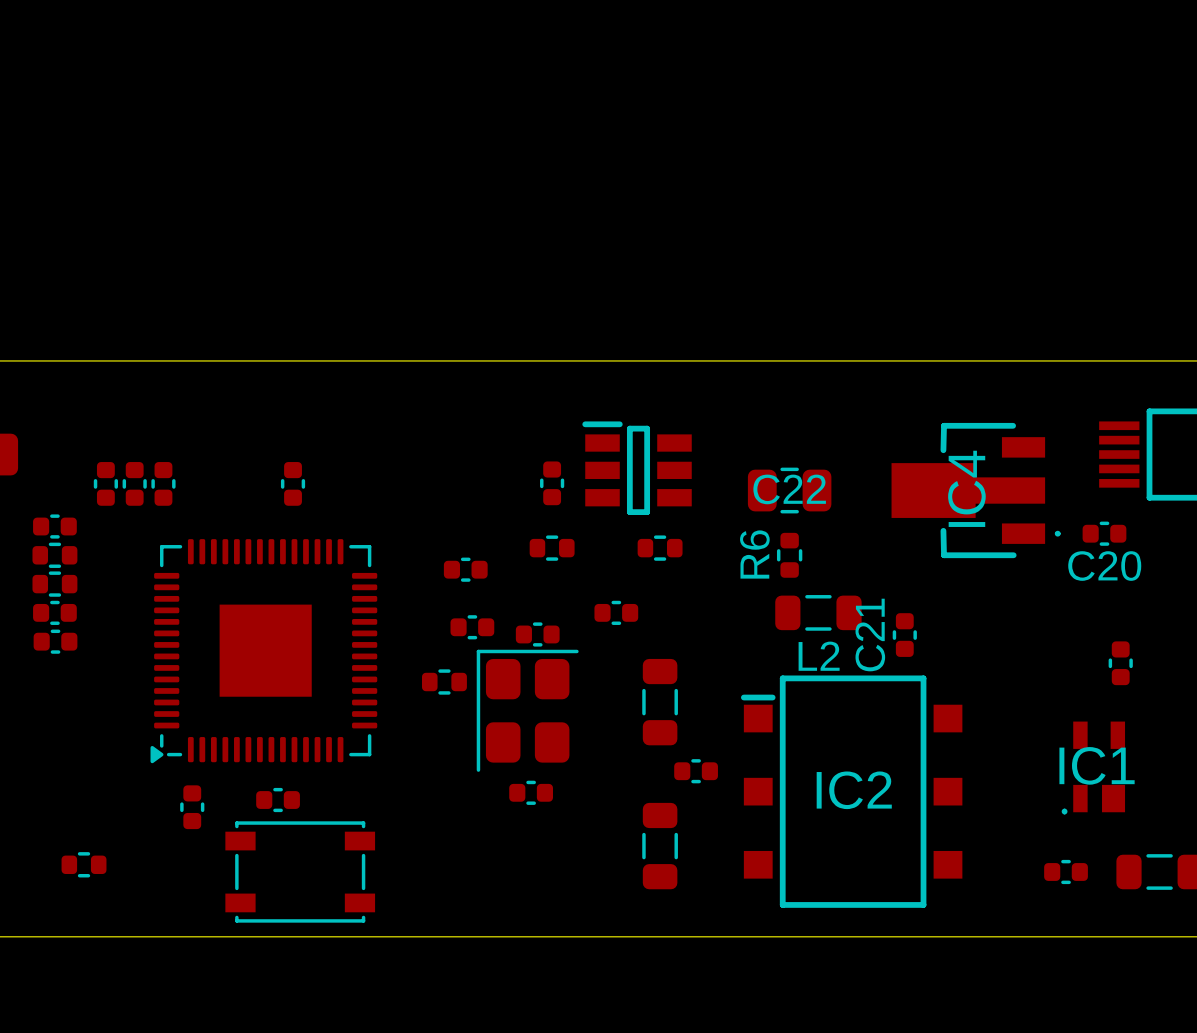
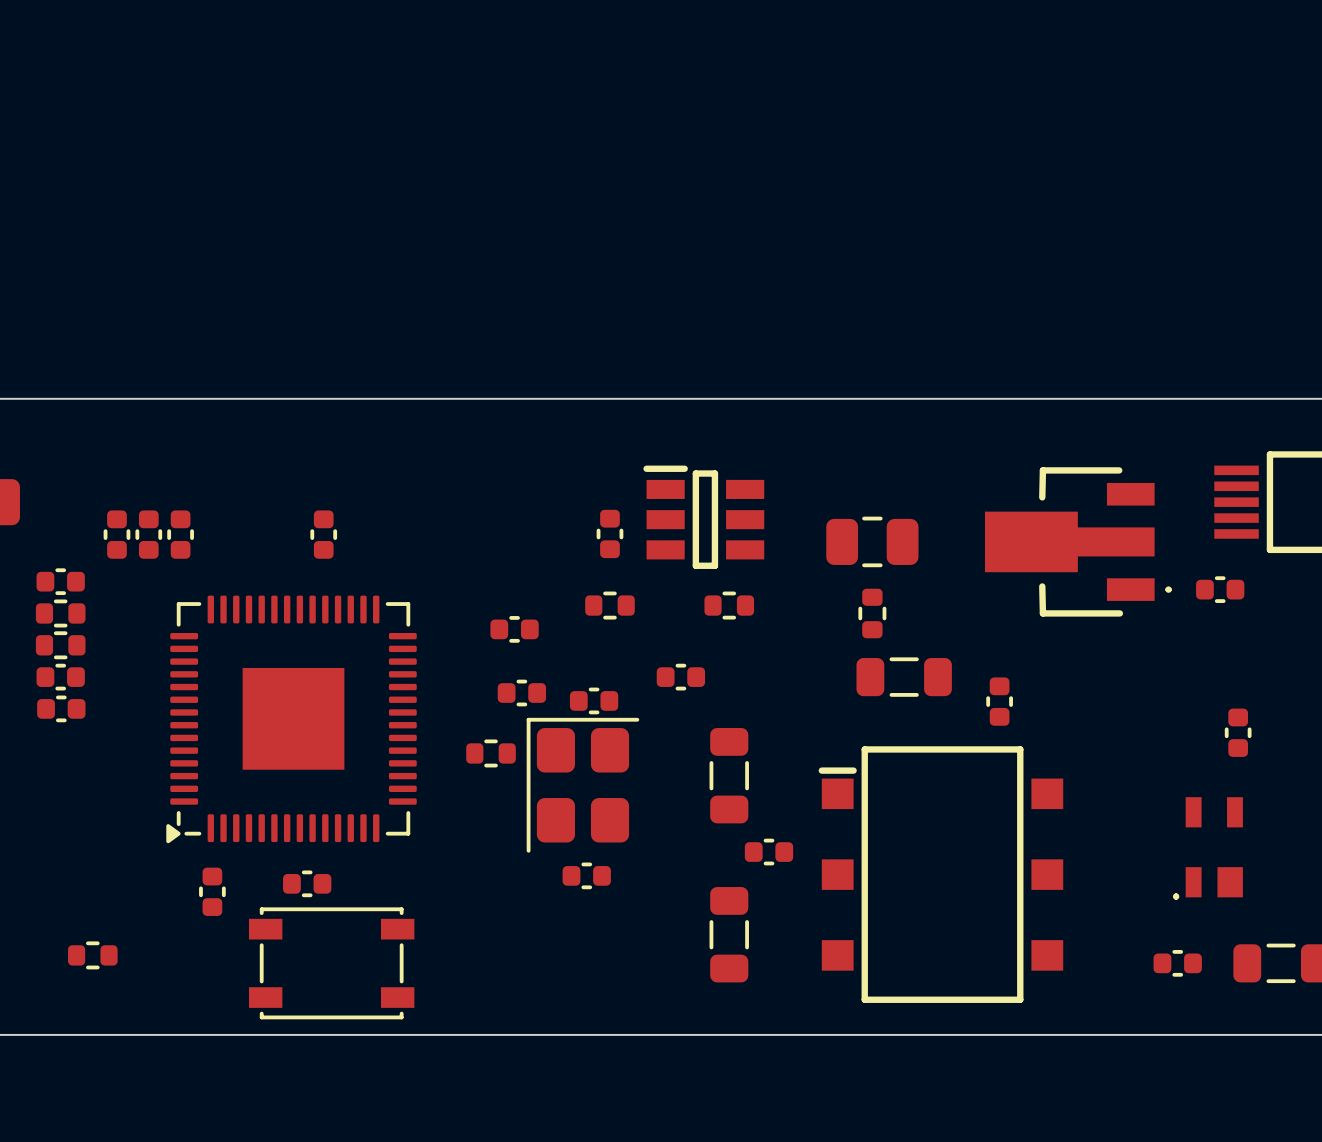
IC4 name: IC4 (966, 488) -> none
C22 name: C22 (789, 489) -> none
R6 name: R6 (754, 554) -> none
C20 name: C20 (1104, 566) -> none
C21 name: C21 (870, 635) -> none
L2 name: L2 (819, 656) -> none
IC1 name: IC1 (1097, 765) -> none
IC2 name: IC2 (854, 790) -> none

